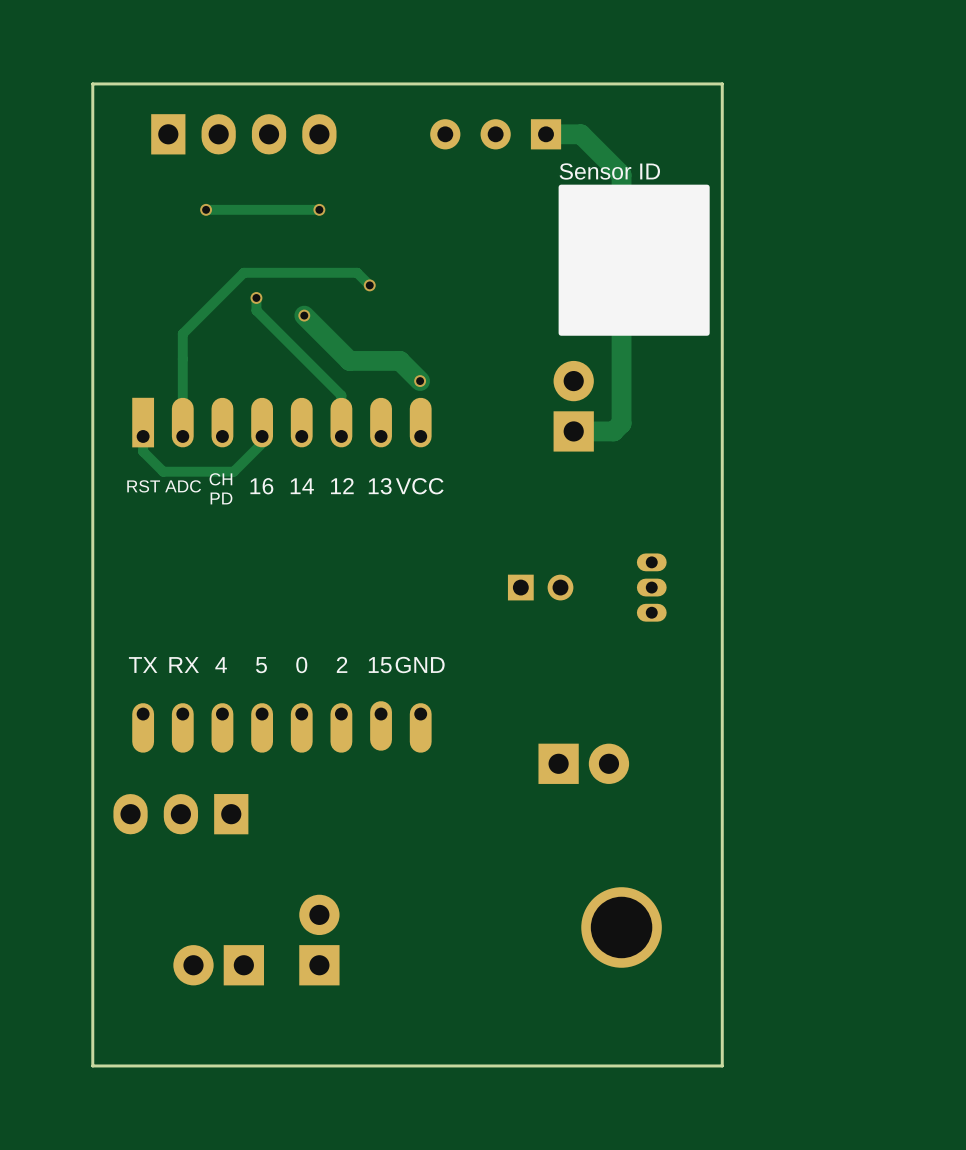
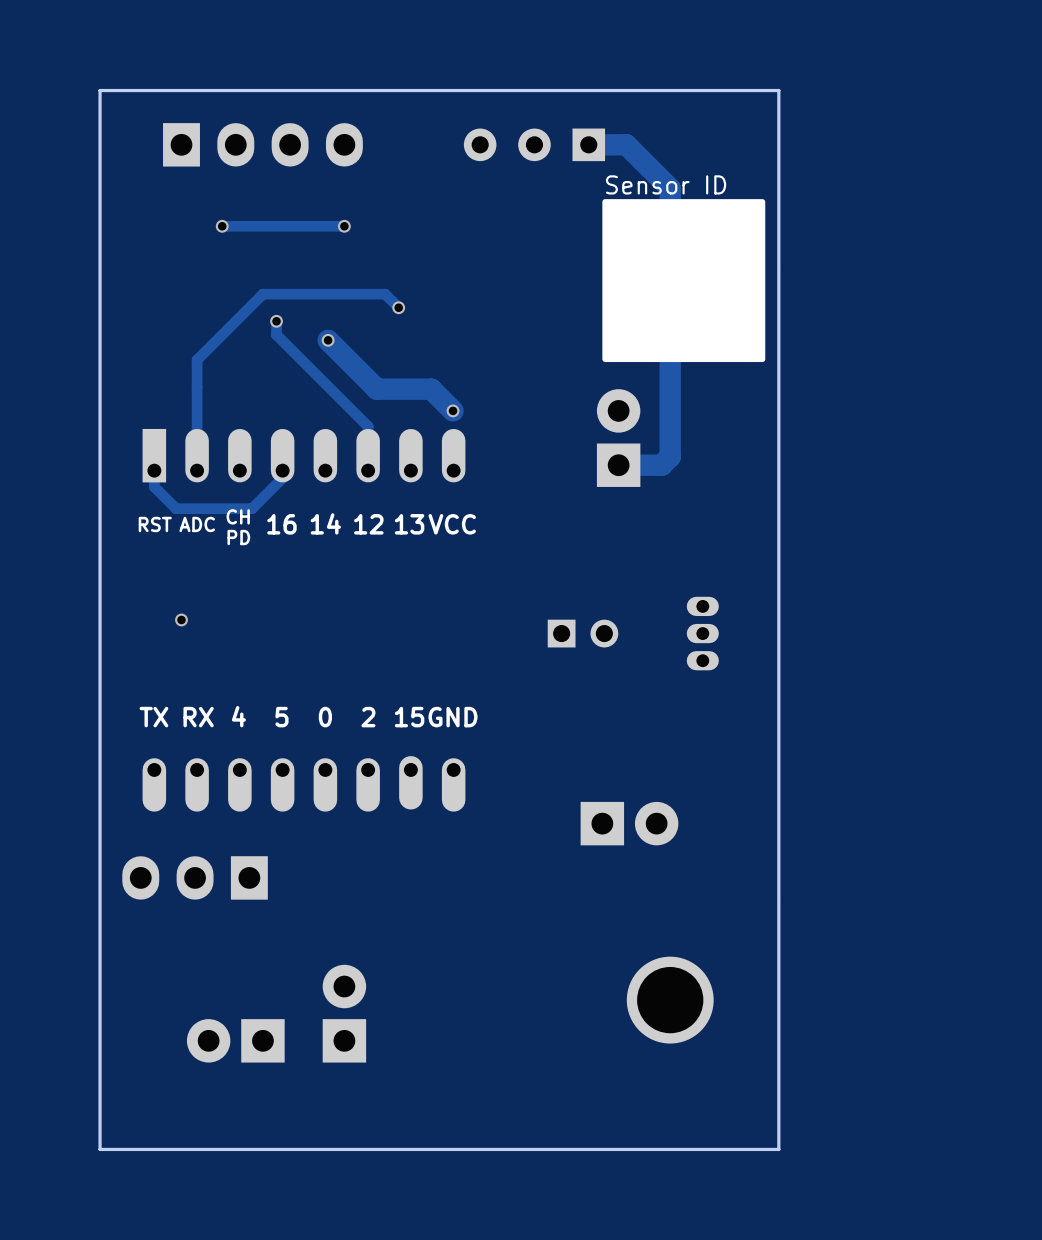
via: none -> (181, 619)

